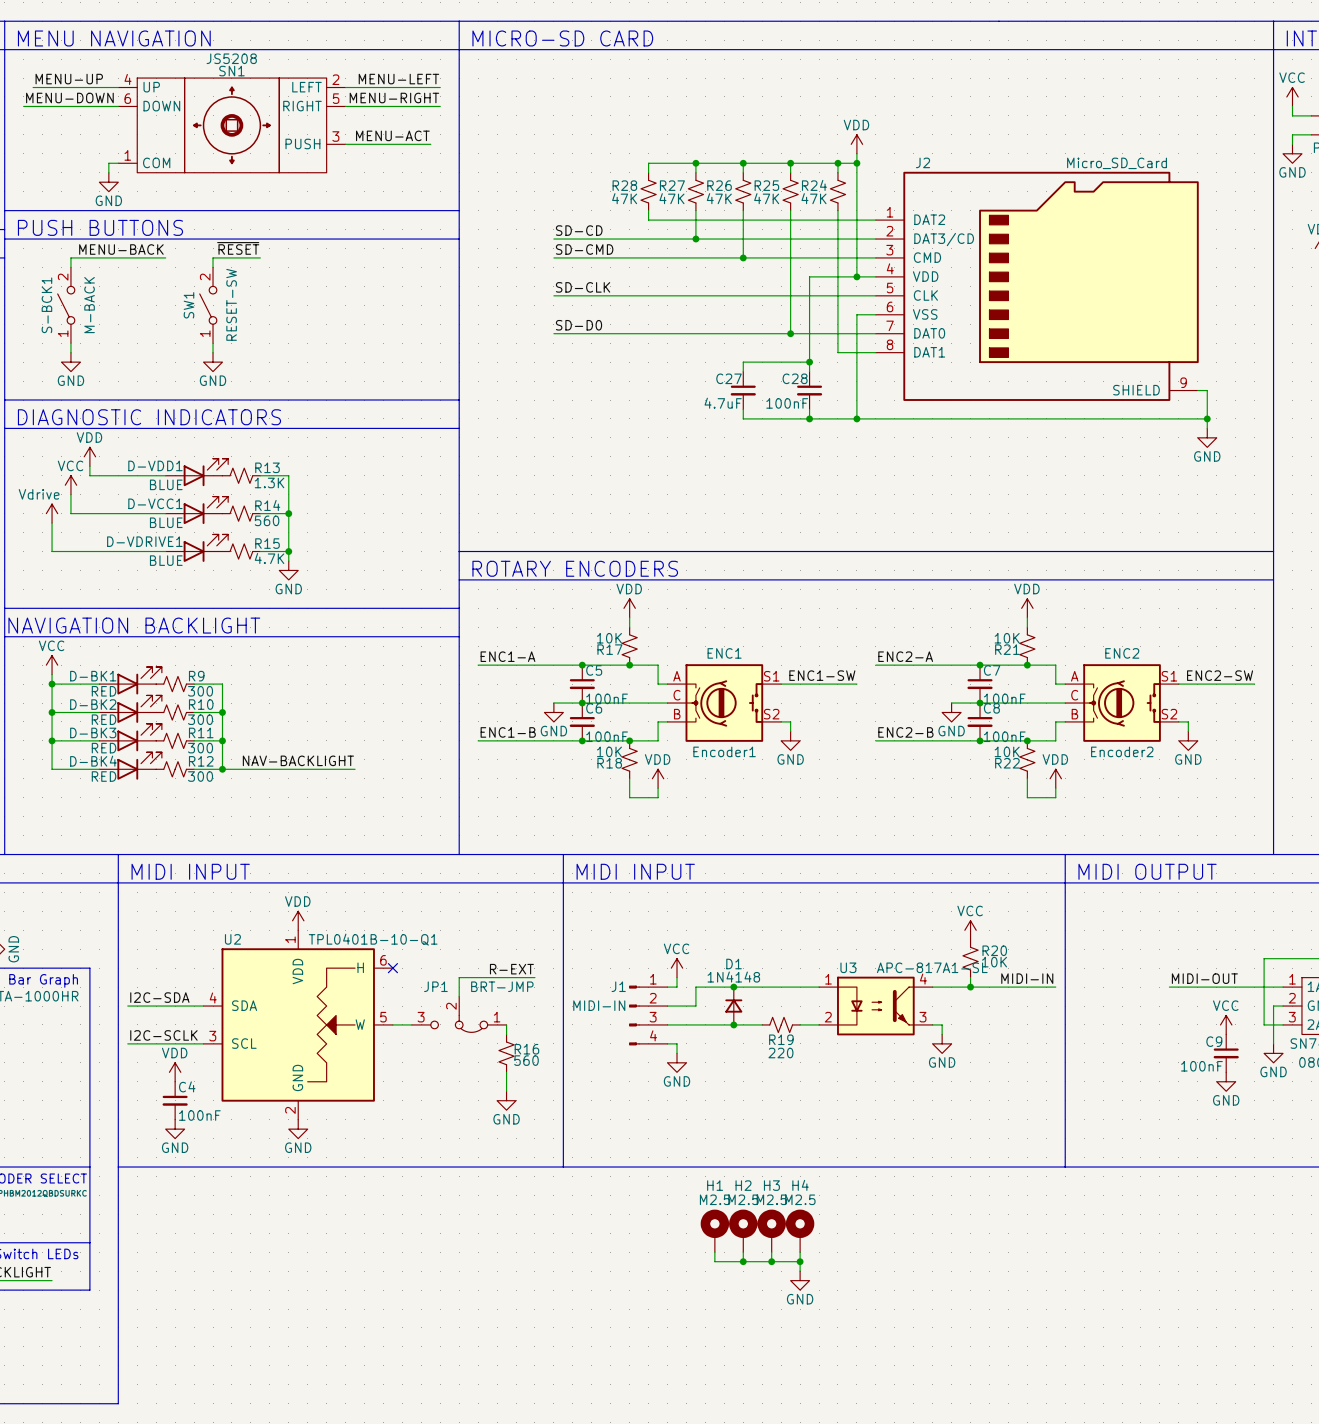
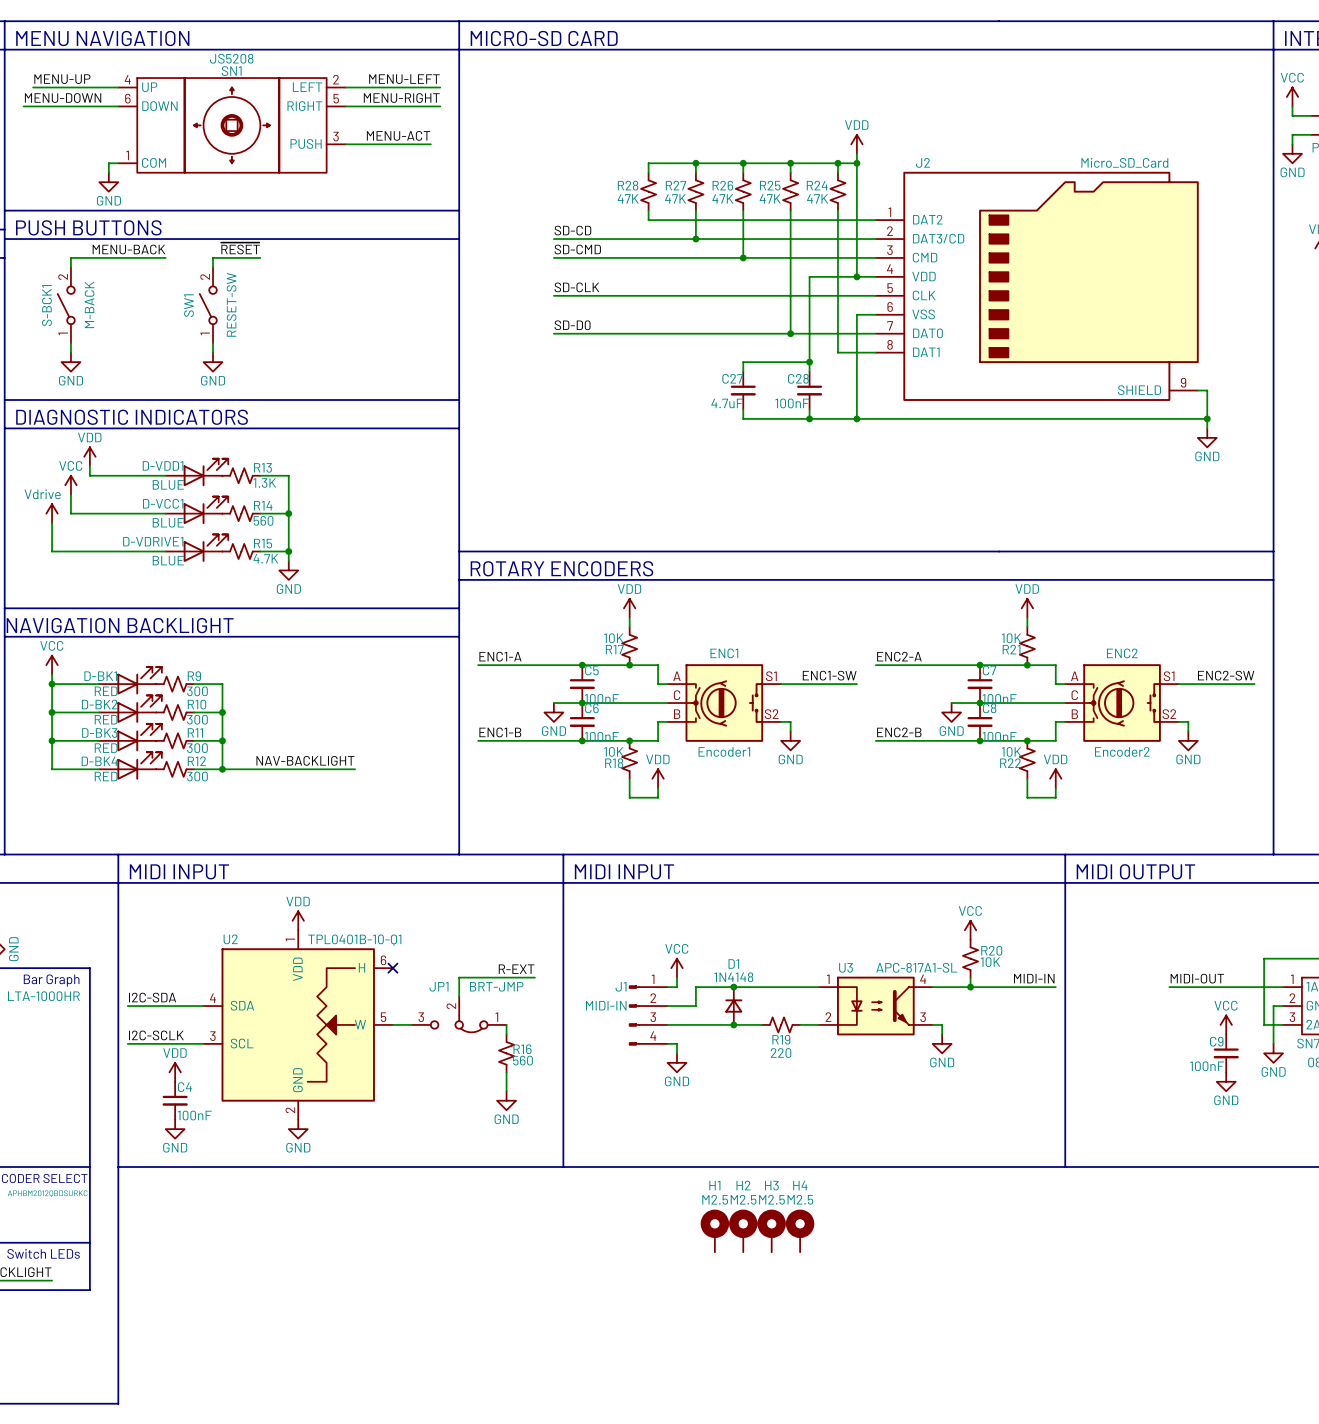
wire: (714, 1252) (714, 1261) (800, 1261) -> none
wire: (743, 1252) (743, 1261) -> none
wire: (771, 1252) (771, 1261) -> none
wire: (800, 1252) (800, 1271) -> none
junction: (743, 1261) -> none
junction: (771, 1261) -> none
junction: (800, 1261) -> none
power symbol: GND (800, 1280) -> none

